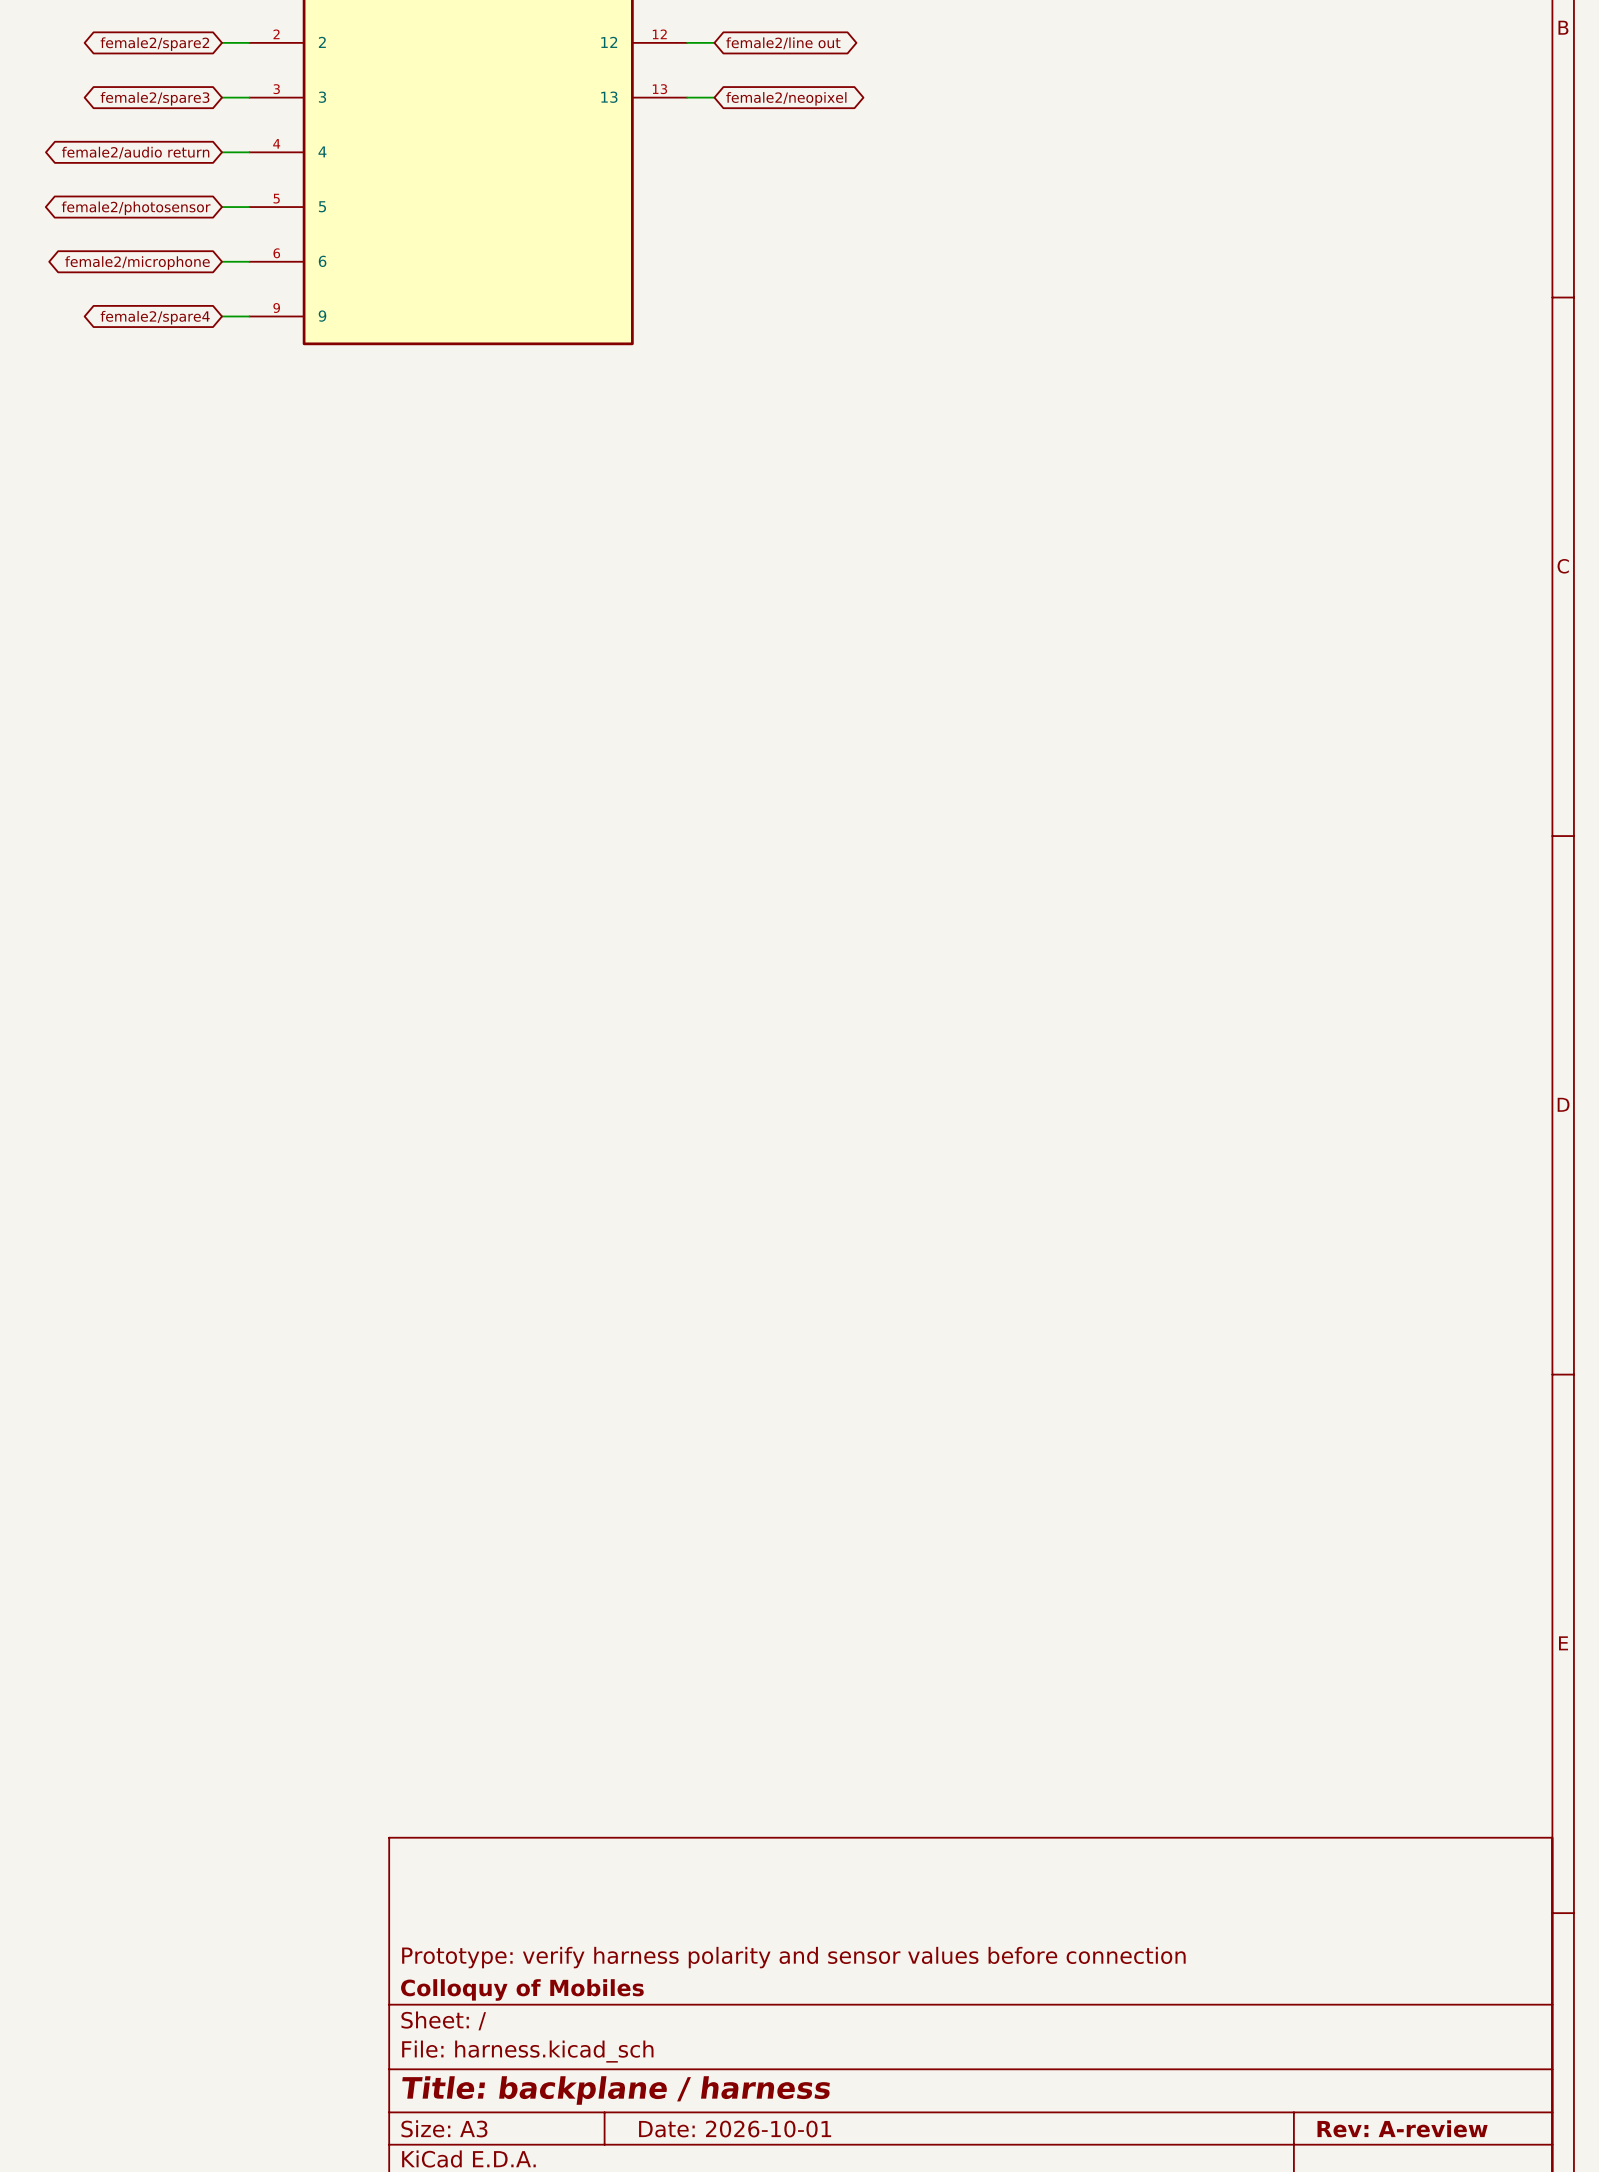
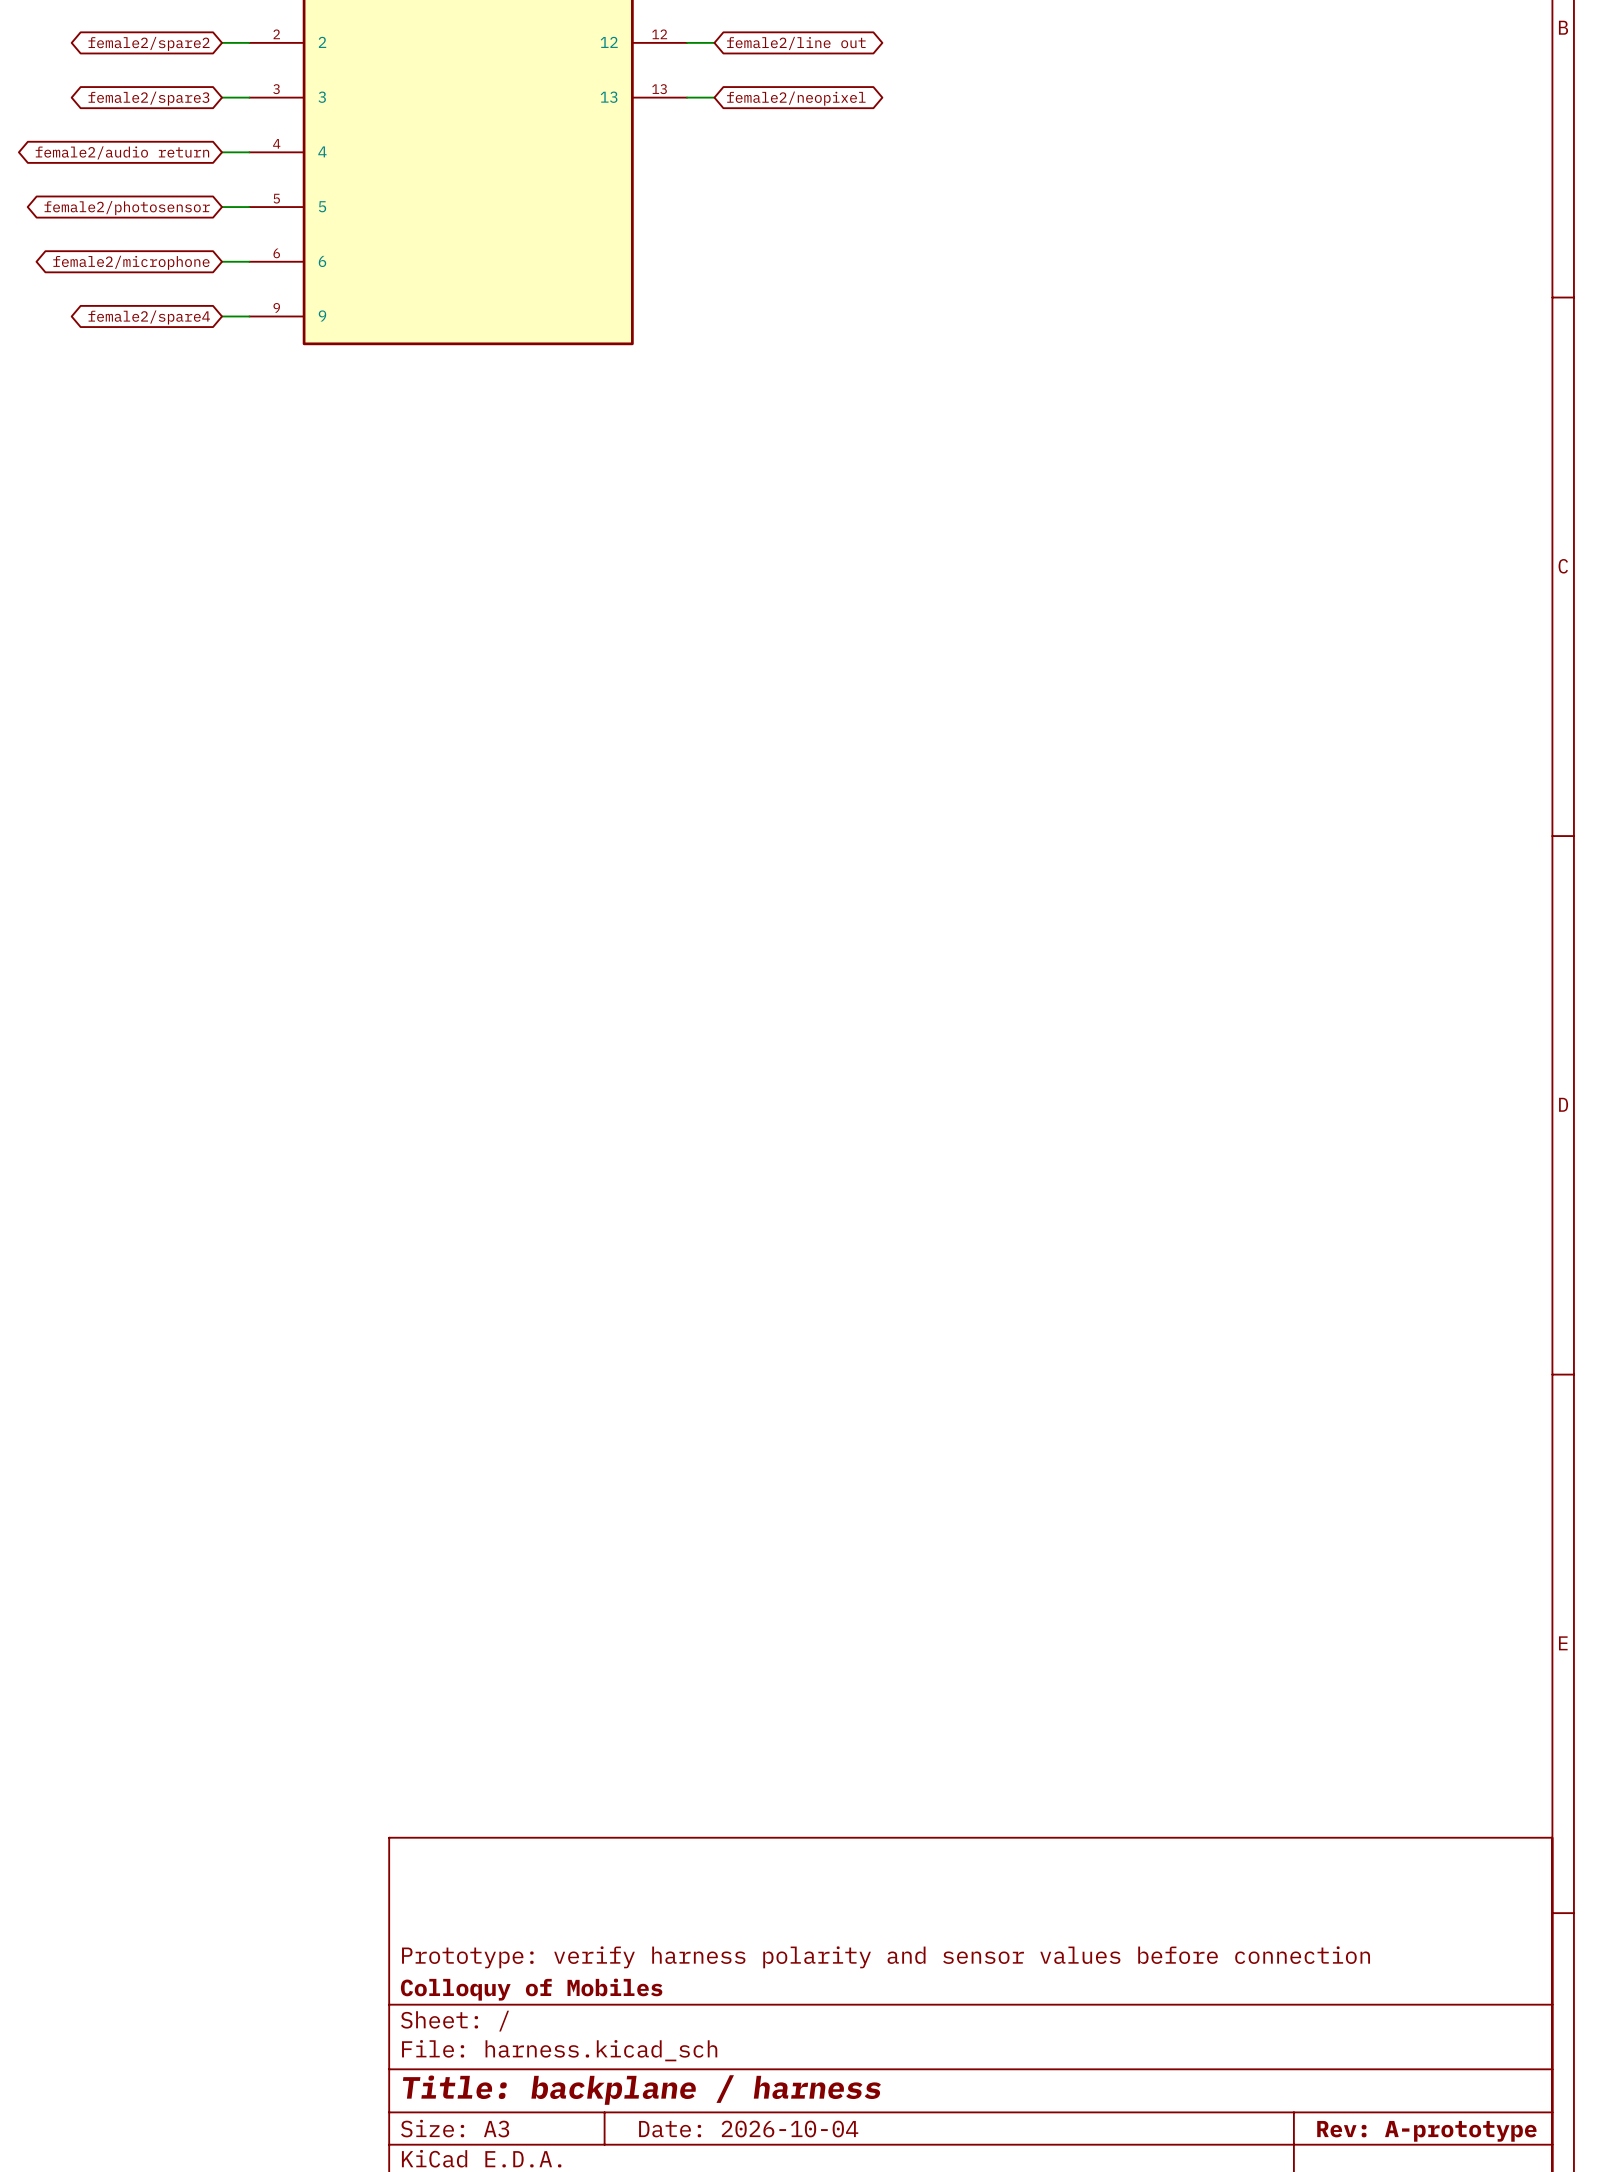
title block: Rev: A-review (1402, 2128) -> Rev: A-prototype (1426, 2131)
title block: Date: 2026-10-01 (735, 2129) -> Date: 2026-10-04 (748, 2129)

